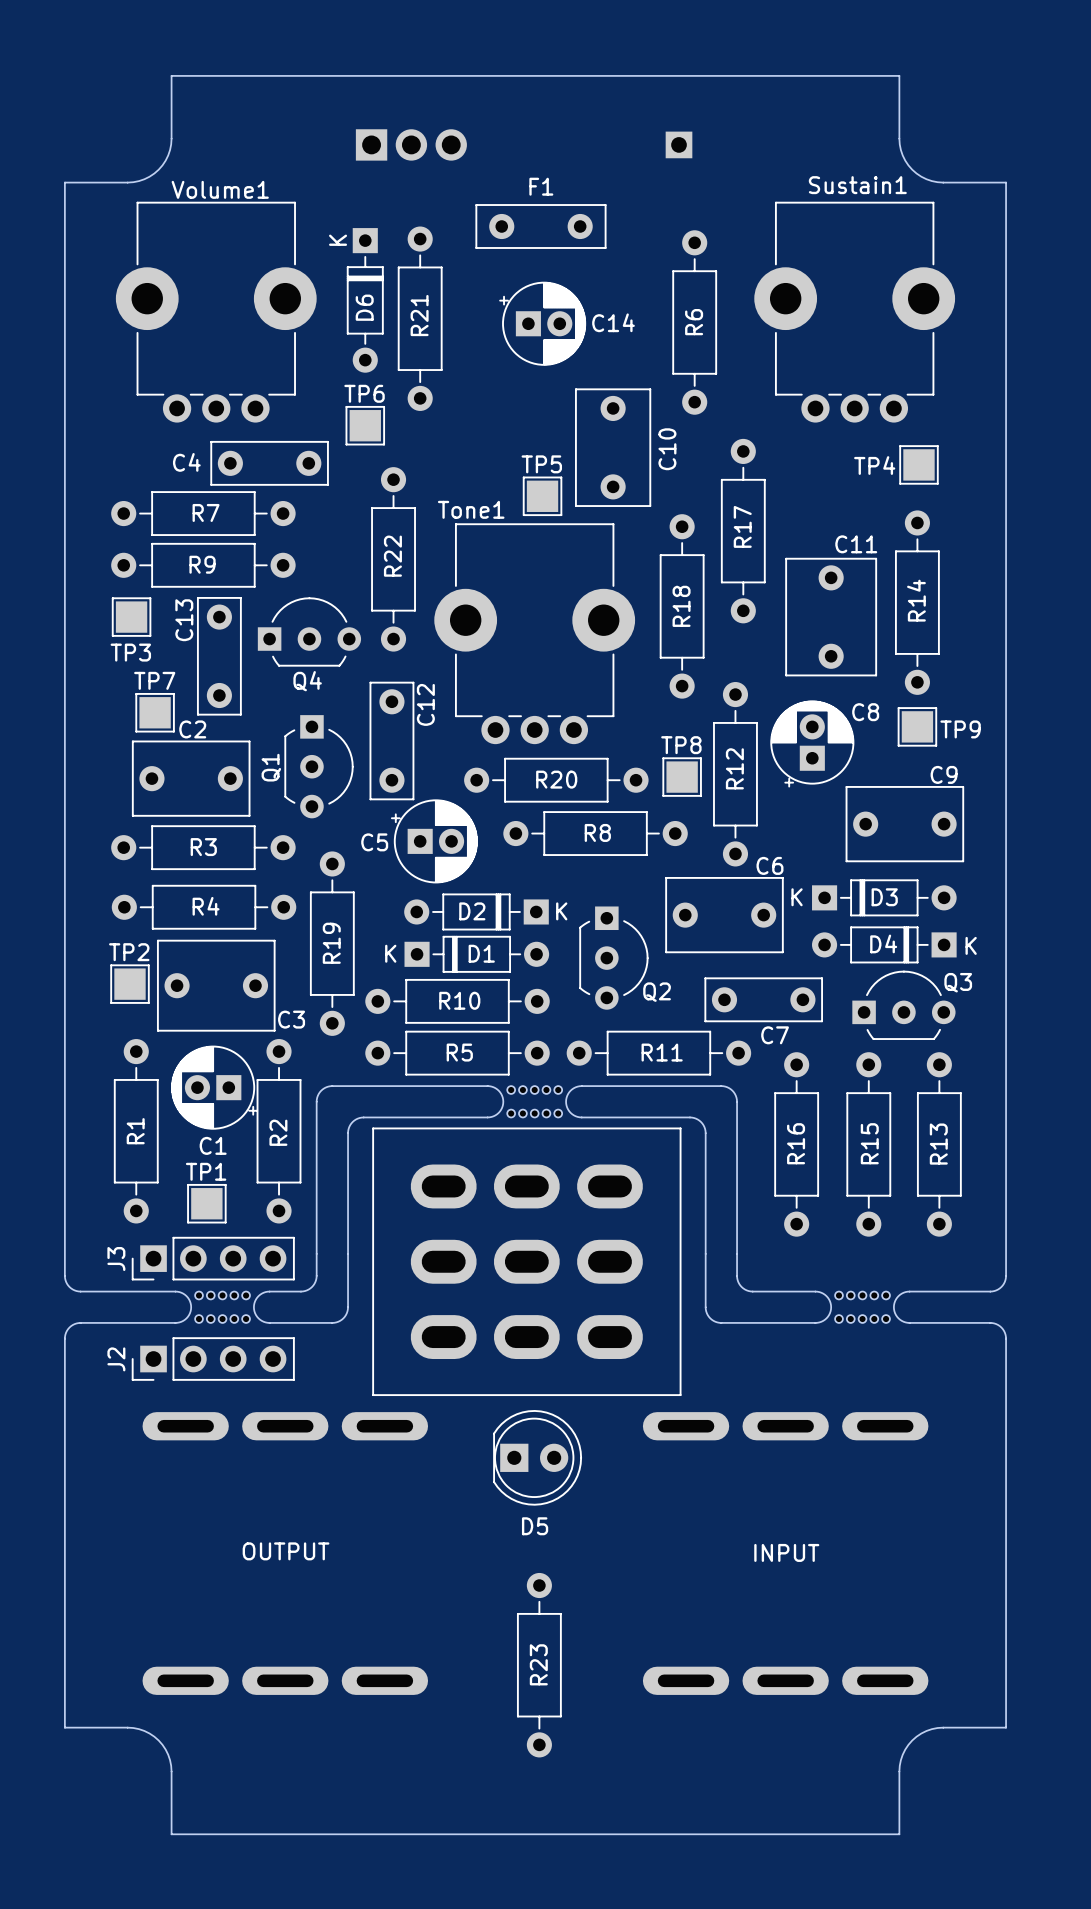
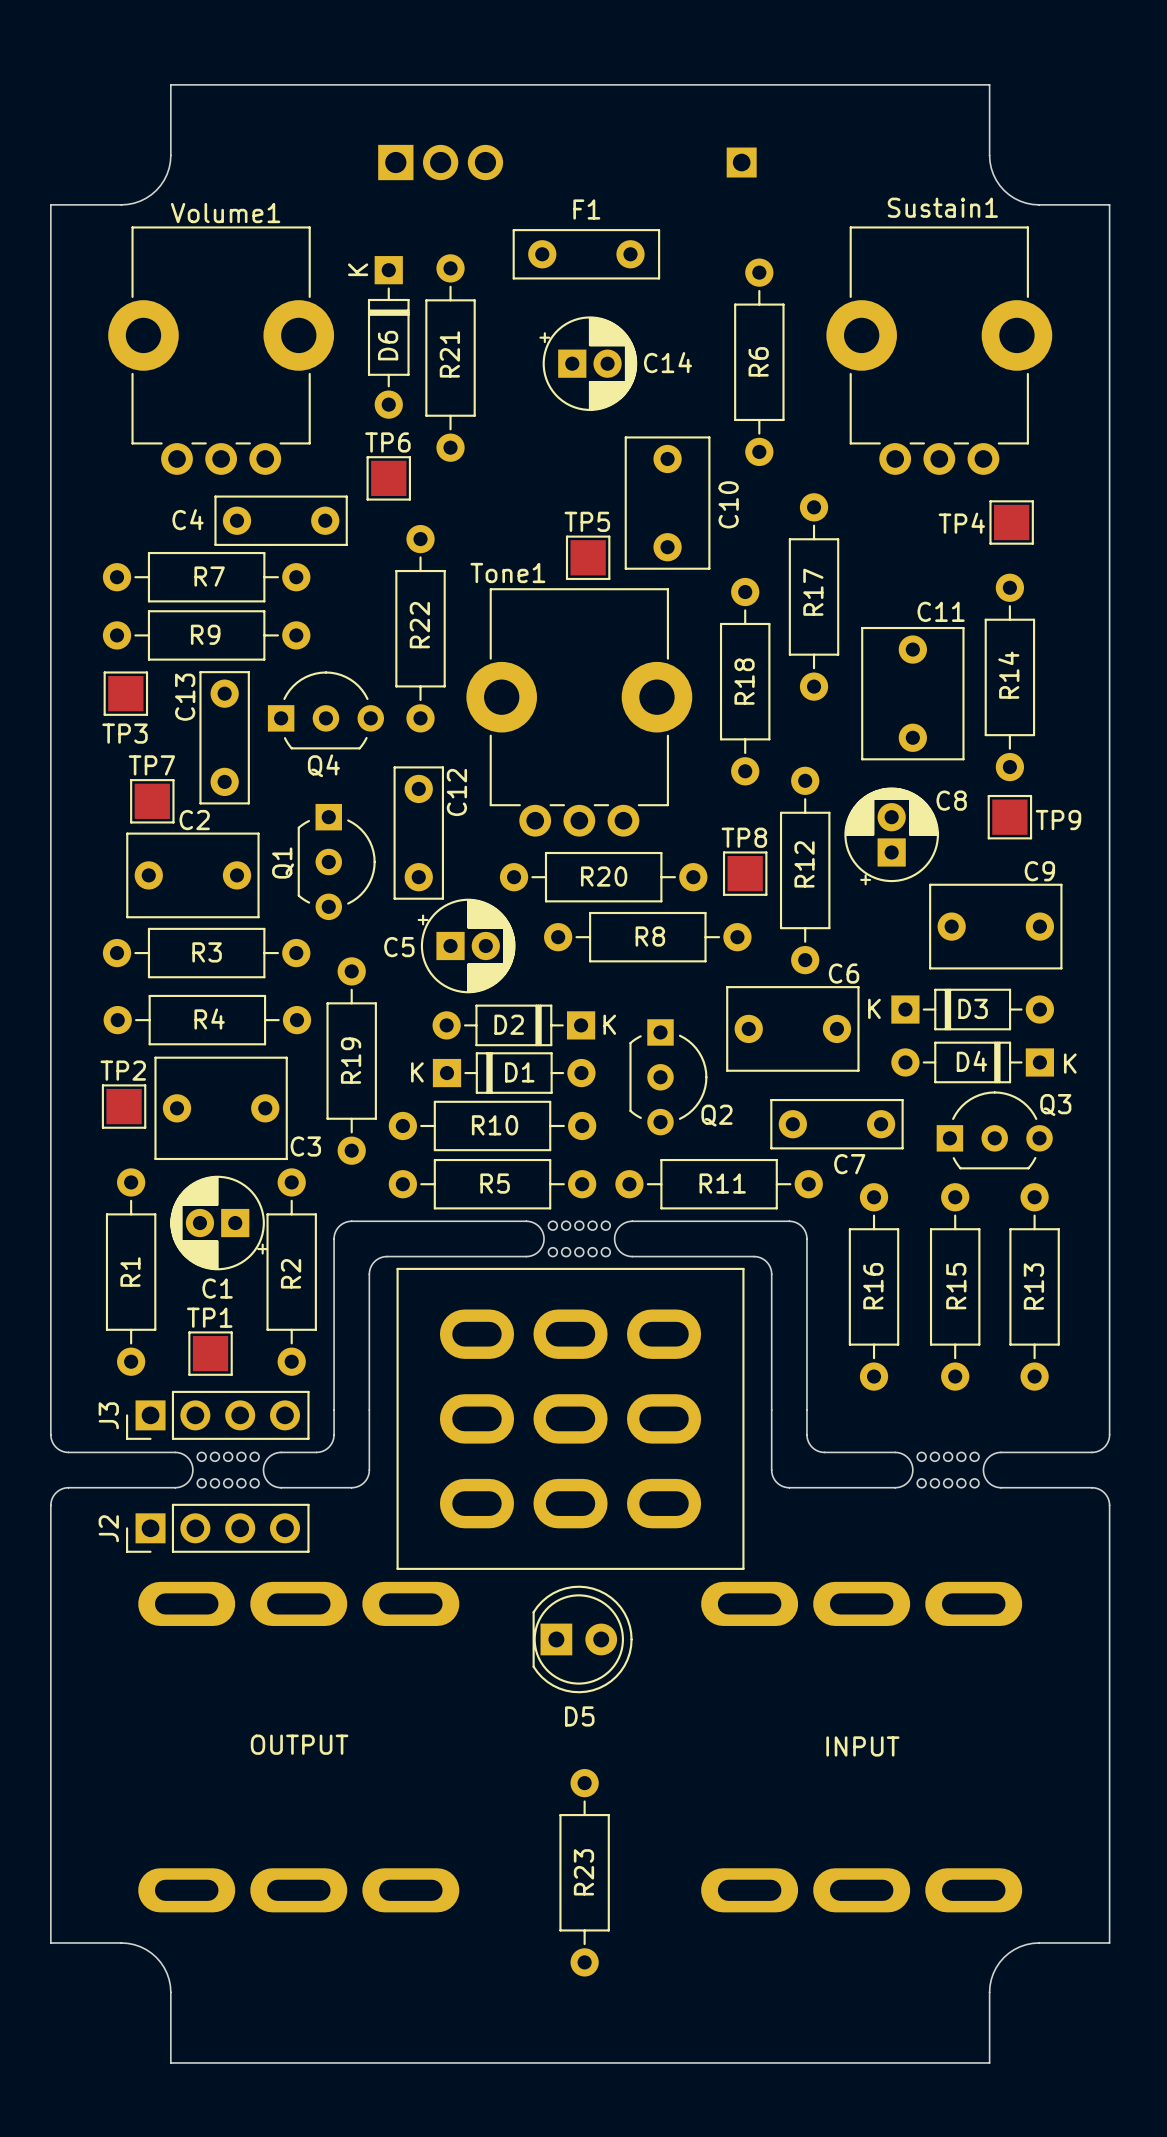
OUTPUT footprint: [142, 1412, 429, 1695] -> [138, 1581, 460, 1913]
INPUT footprint: [642, 1412, 929, 1695] -> [701, 1581, 1023, 1913]

